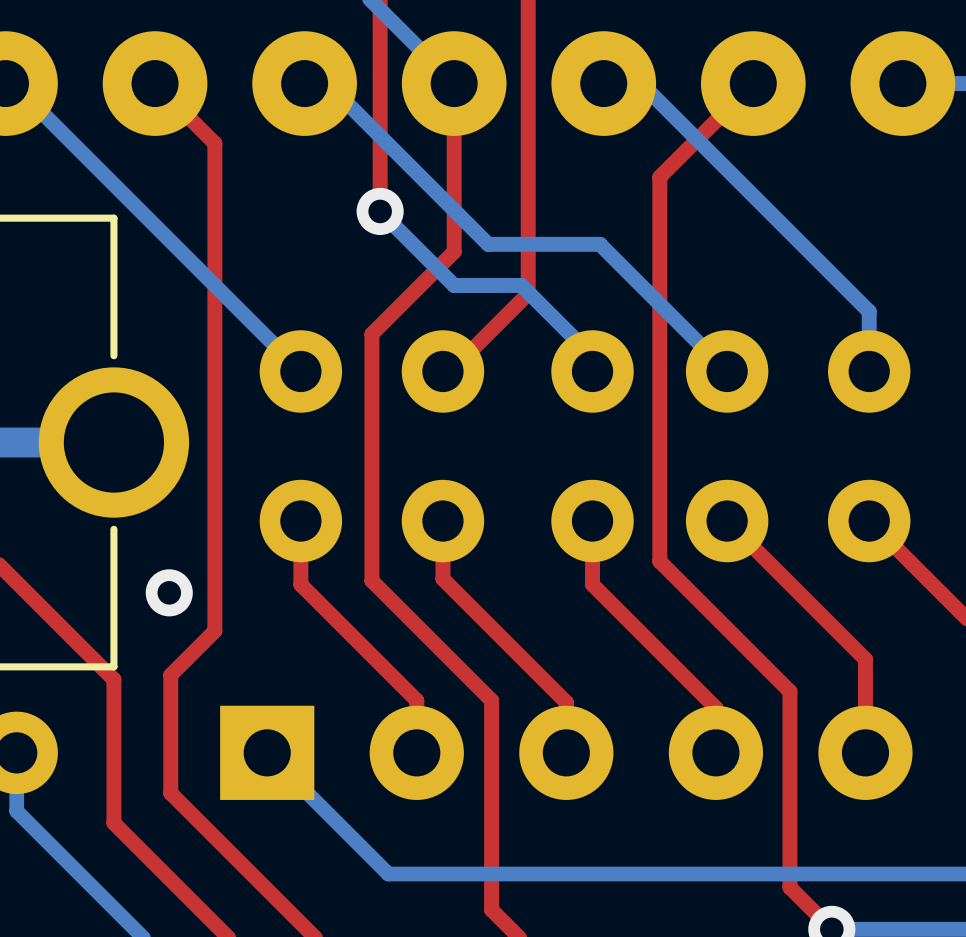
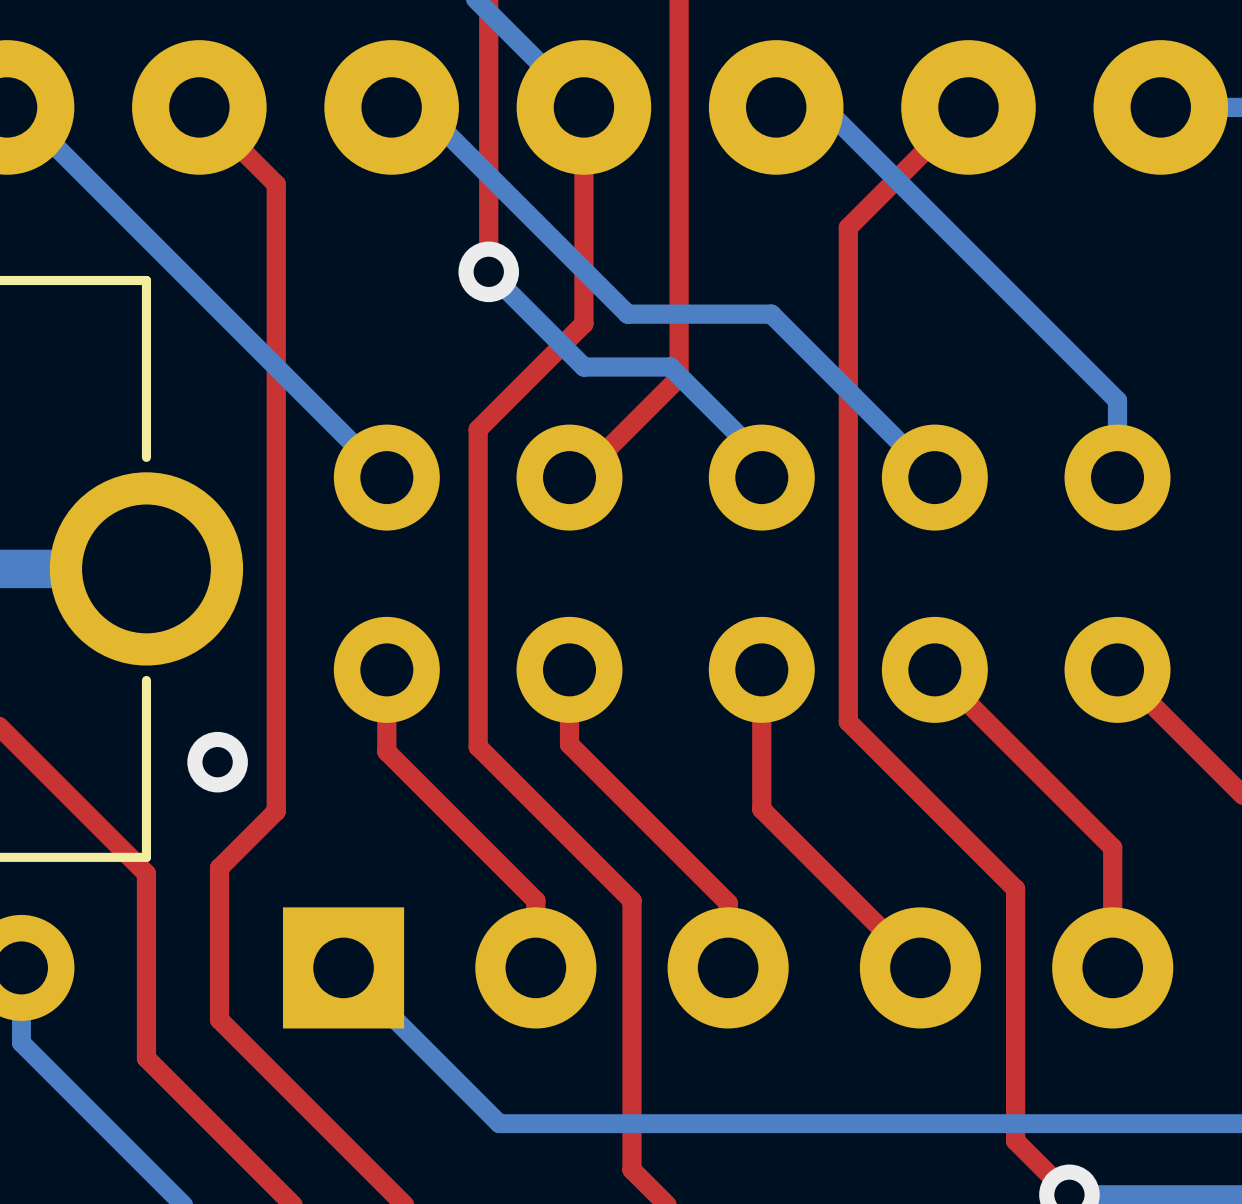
top track: (592, 584) (715, 707) (715, 752) -> (761, 751) (761, 809) (920, 967)

